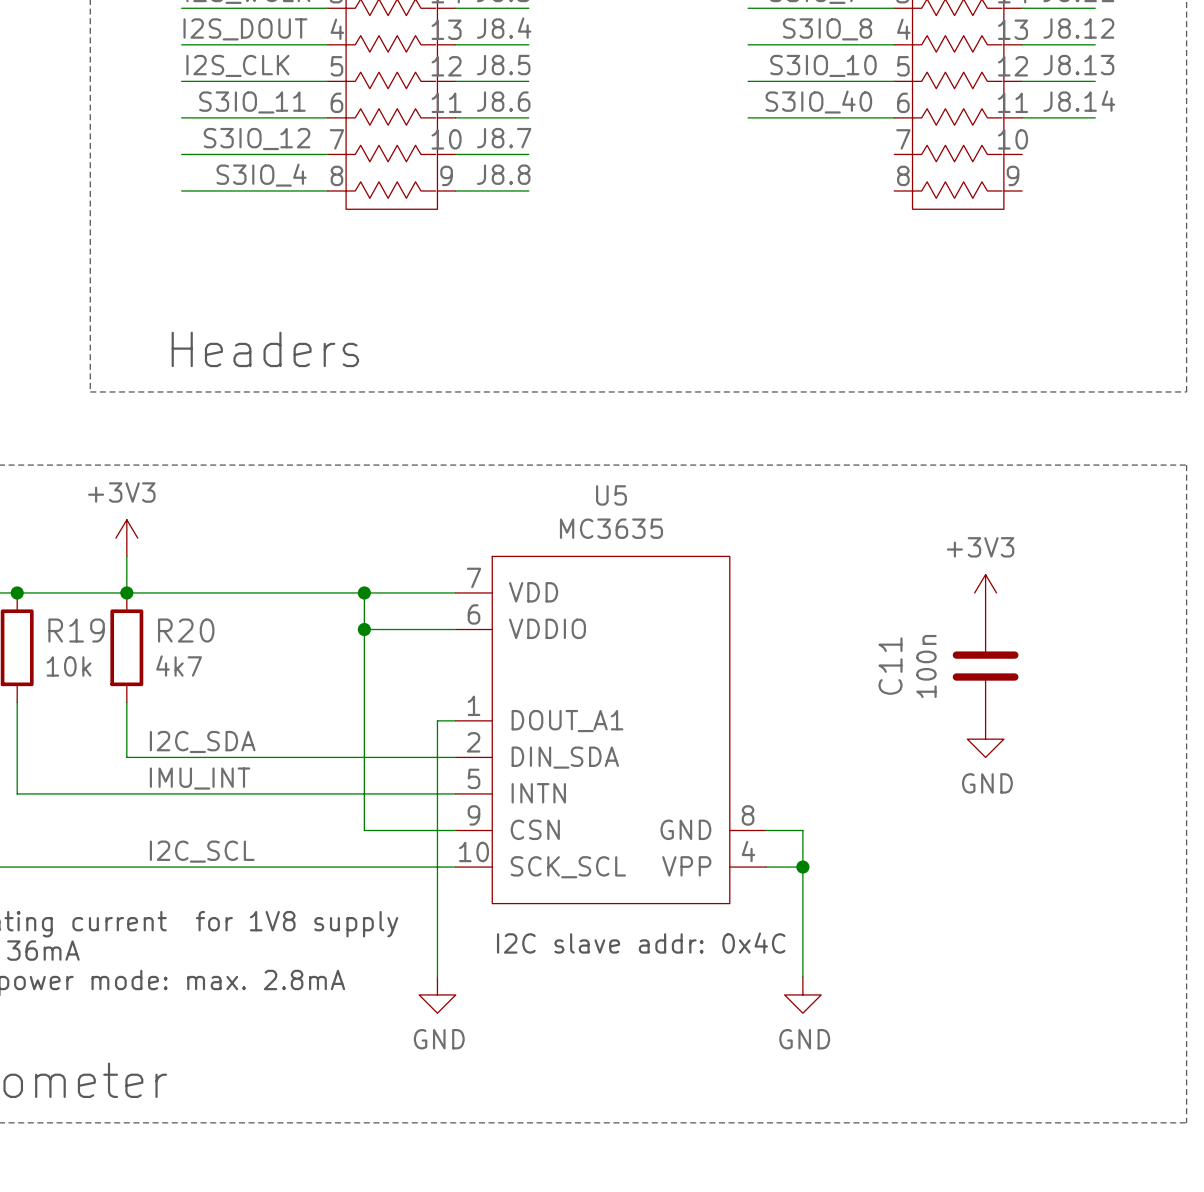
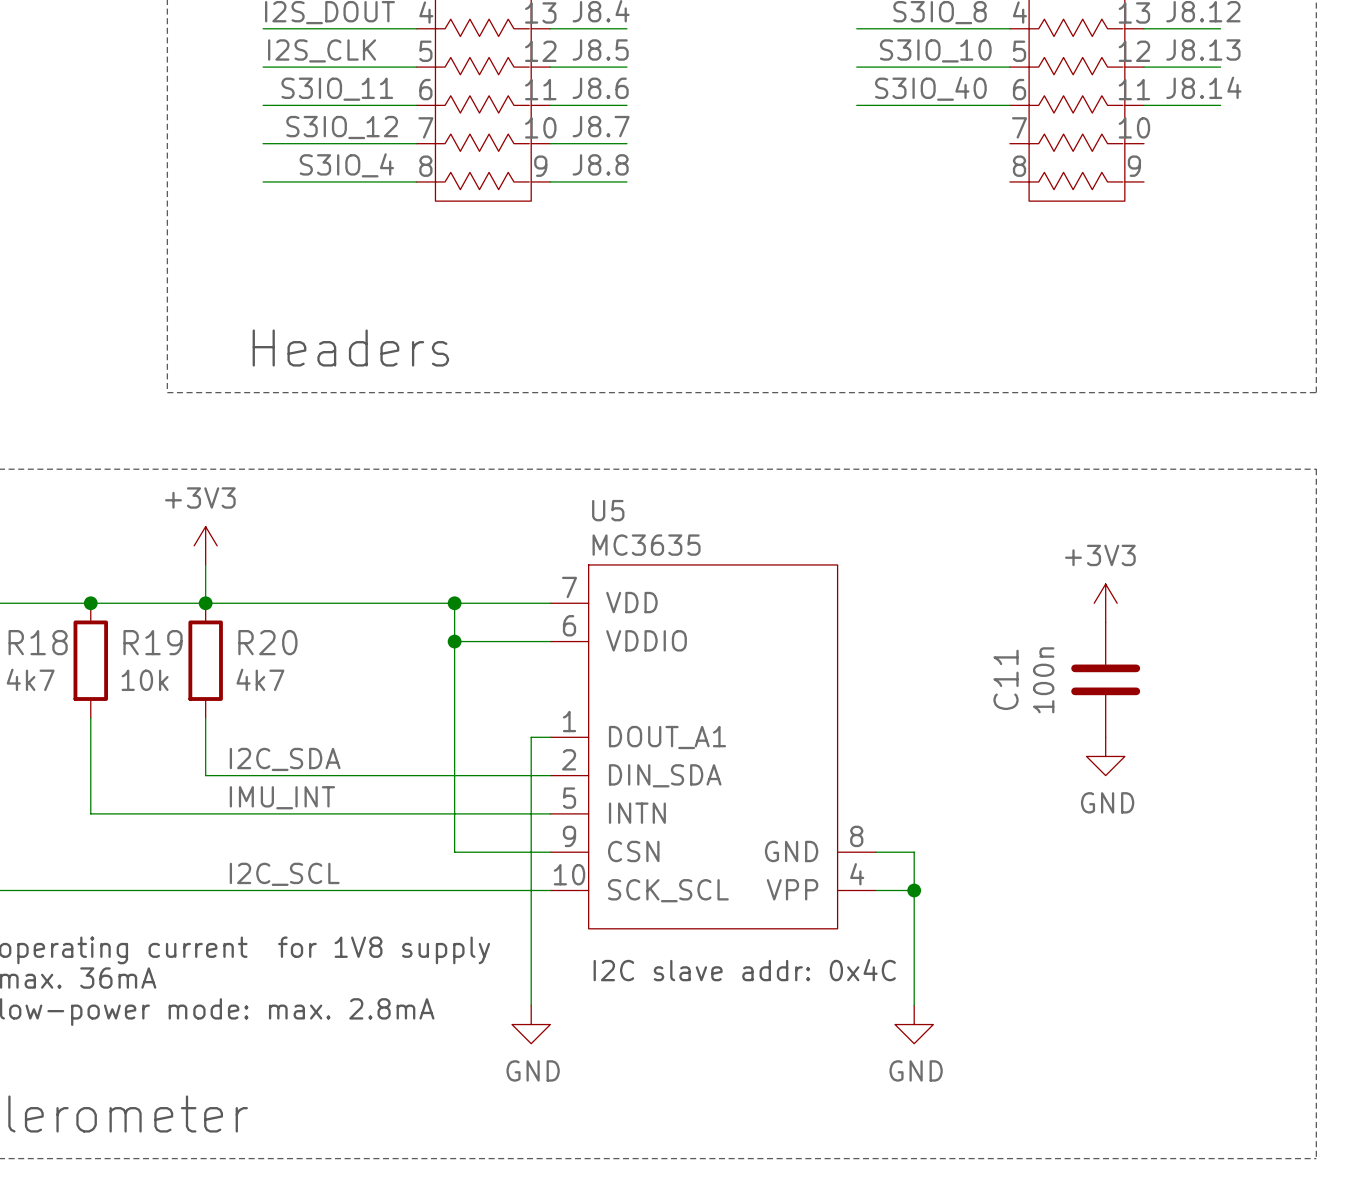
U5 name position: U5 (611, 495) -> U5 (608, 510)
U5 value position: MC3635 (611, 528) -> MC3635 (646, 545)

